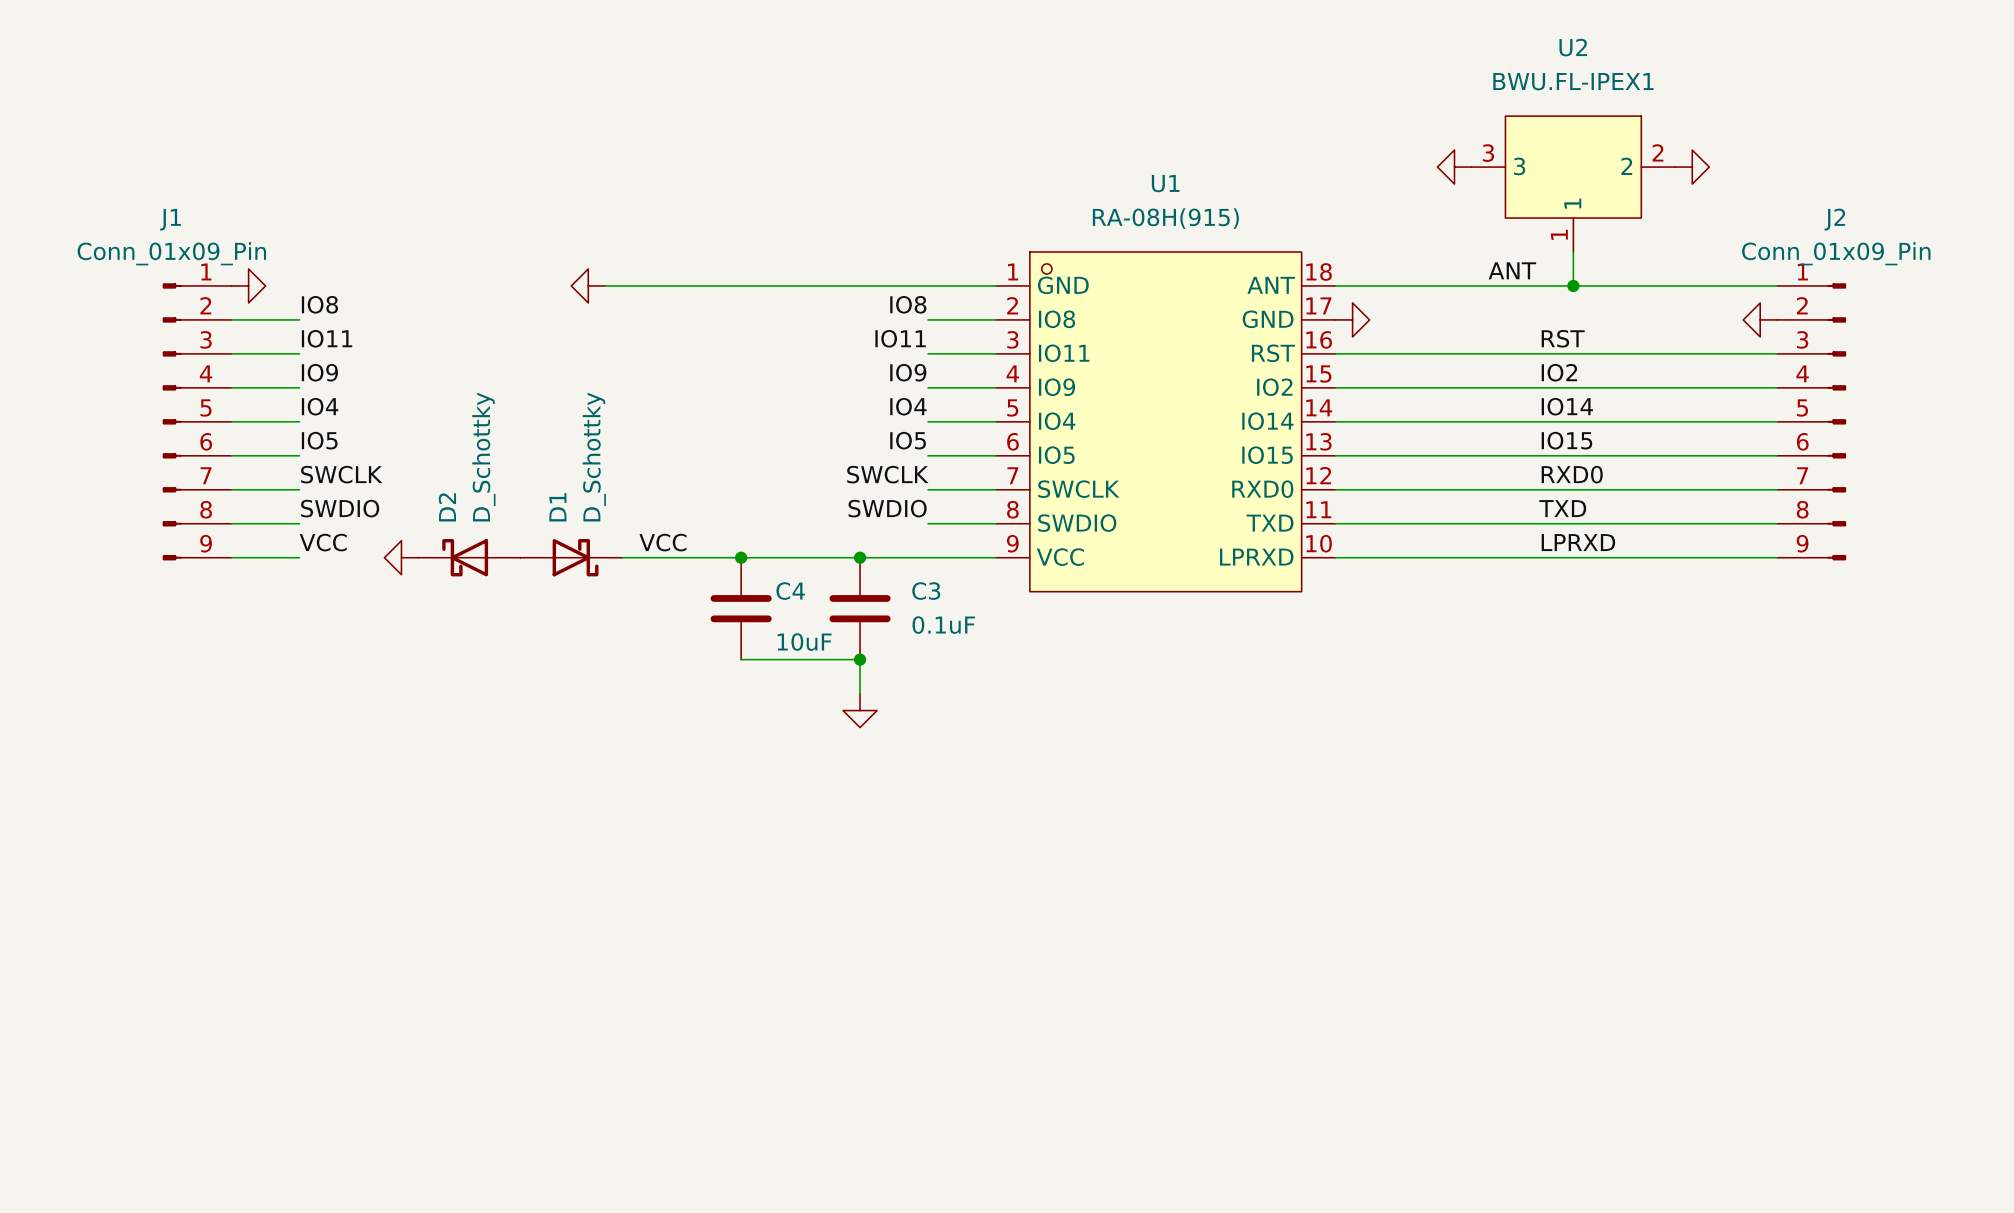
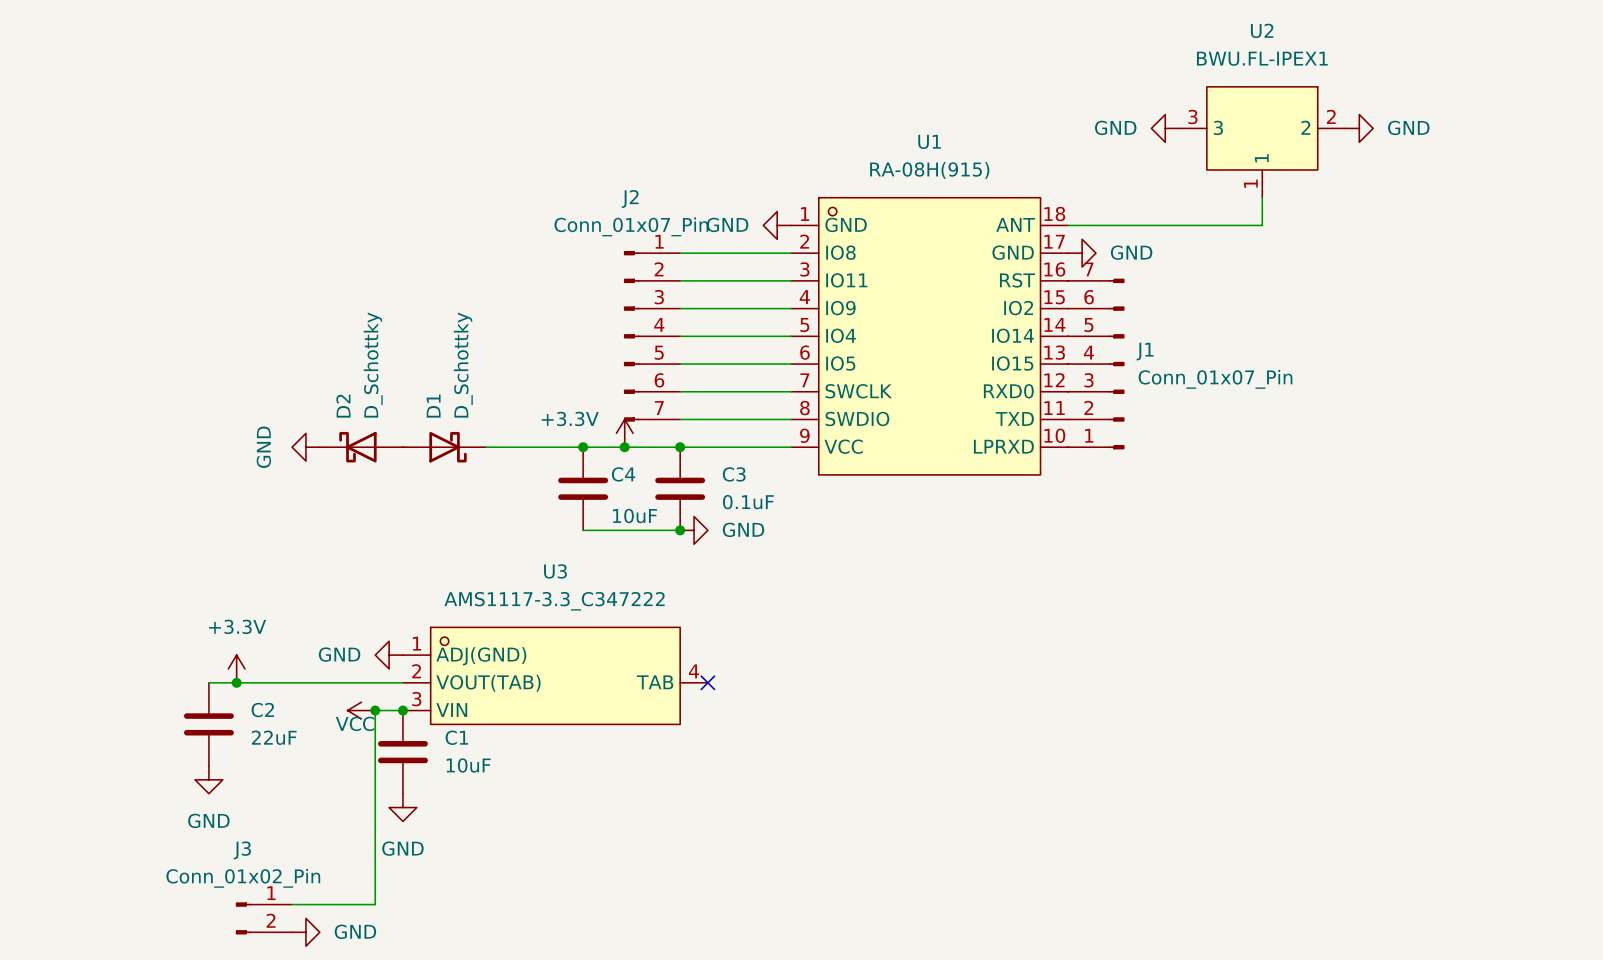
power symbol text: none -> GND (1115, 127)
power symbol text: none -> GND (1408, 127)
J1 name position: J1 (170, 219) -> J1 (1145, 351)
J2 name position: J2 (1834, 219) -> J2 (630, 198)
J1 value: Conn_01x09_Pin (171, 253) -> Conn_01x07_Pin (1215, 379)
J2 value: Conn_01x09_Pin (1836, 253) -> Conn_01x07_Pin (631, 226)
label: ANT (1512, 270) -> none
J1 symbol: [162, 283, 232, 561] -> [1068, 278, 1125, 450]
J2 symbol: [1777, 283, 1847, 561] -> [623, 250, 681, 422]
power symbol: (248, 285) -> none
power symbol: (588, 285) -> none
wire: (605, 285) (995, 285) -> none
power symbol: none -> GND (777, 225)
wire: (1573, 285) (1777, 285) -> none
junction: (1573, 285) -> none
label: IO8 (319, 304) -> none
label: IO8 (908, 304) -> none
wire: (231, 319) (299, 319) -> none
wire: none -> (680, 253) (735, 253)
power symbol text: none -> GND (1131, 252)
power symbol: (1760, 319) -> none
label: IO11 (327, 338) -> none
label: IO11 (900, 338) -> none
label: RST (1563, 338) -> none
wire: (231, 353) (299, 353) -> none
wire: none -> (680, 280) (735, 280)
wire: (1335, 353) (1777, 353) -> none
label: IO9 (319, 372) -> none
label: IO9 (908, 372) -> none
label: IO2 (1559, 372) -> none
wire: (231, 387) (299, 387) -> none
wire: none -> (680, 308) (735, 308)
wire: (1335, 387) (1777, 387) -> none
label: IO4 (320, 406) -> none
label: IO4 (908, 406) -> none
label: IO14 (1567, 406) -> none
wire: (231, 421) (299, 421) -> none
wire: none -> (680, 336) (735, 336)
wire: (1335, 421) (1777, 421) -> none
label: IO5 (319, 440) -> none
label: IO5 (908, 440) -> none
label: IO15 (1566, 440) -> none
wire: (231, 455) (299, 455) -> none
wire: none -> (680, 364) (735, 364)
wire: (1335, 455) (1777, 455) -> none
label: SWCLK (341, 474) -> none
label: SWCLK (887, 474) -> none
label: RXD0 (1572, 474) -> none
wire: (231, 489) (299, 489) -> none
wire: none -> (680, 391) (735, 391)
wire: (1335, 489) (1777, 489) -> none
label: SWDIO (340, 508) -> none
label: SWDIO (887, 508) -> none
label: TXD (1562, 508) -> none
wire: (231, 523) (299, 523) -> none
wire: none -> (680, 419) (735, 419)
wire: (1335, 523) (1777, 523) -> none
power symbol: none -> +3.3V (624, 433)
label: VCC (323, 542) -> none
label: VCC (662, 542) -> none
label: LPRXD (1578, 542) -> none
wire: (231, 557) (299, 557) -> none
power symbol text: none -> GND (263, 447)
junction: none -> (624, 447)
wire: (1335, 557) (1777, 557) -> none
wire: (860, 659) (860, 693) -> none
power symbol: none -> GND (694, 530)
power symbol: (860, 710) -> none
power symbol: none -> GND (389, 655)
power symbol: none -> +3.3V (236, 668)
U3: none -> AMS1117-3.3_C347222 (555, 675)
wire: none -> (208, 682) (402, 682)
junction: none -> (236, 682)
no-connect mark: none -> (707, 682)
power symbol: none -> VCC (361, 710)
junction: none -> (375, 710)
wire: none -> (402, 710) (375, 710) (375, 904) (292, 904)
junction: none -> (402, 710)
C2: none -> 22uF (208, 724)
C1: none -> 10uF (402, 752)
power symbol: none -> GND (208, 779)
power symbol: none -> GND (402, 807)
J3: none -> Conn_01x02_Pin (263, 918)
power symbol: none -> GND (305, 932)

